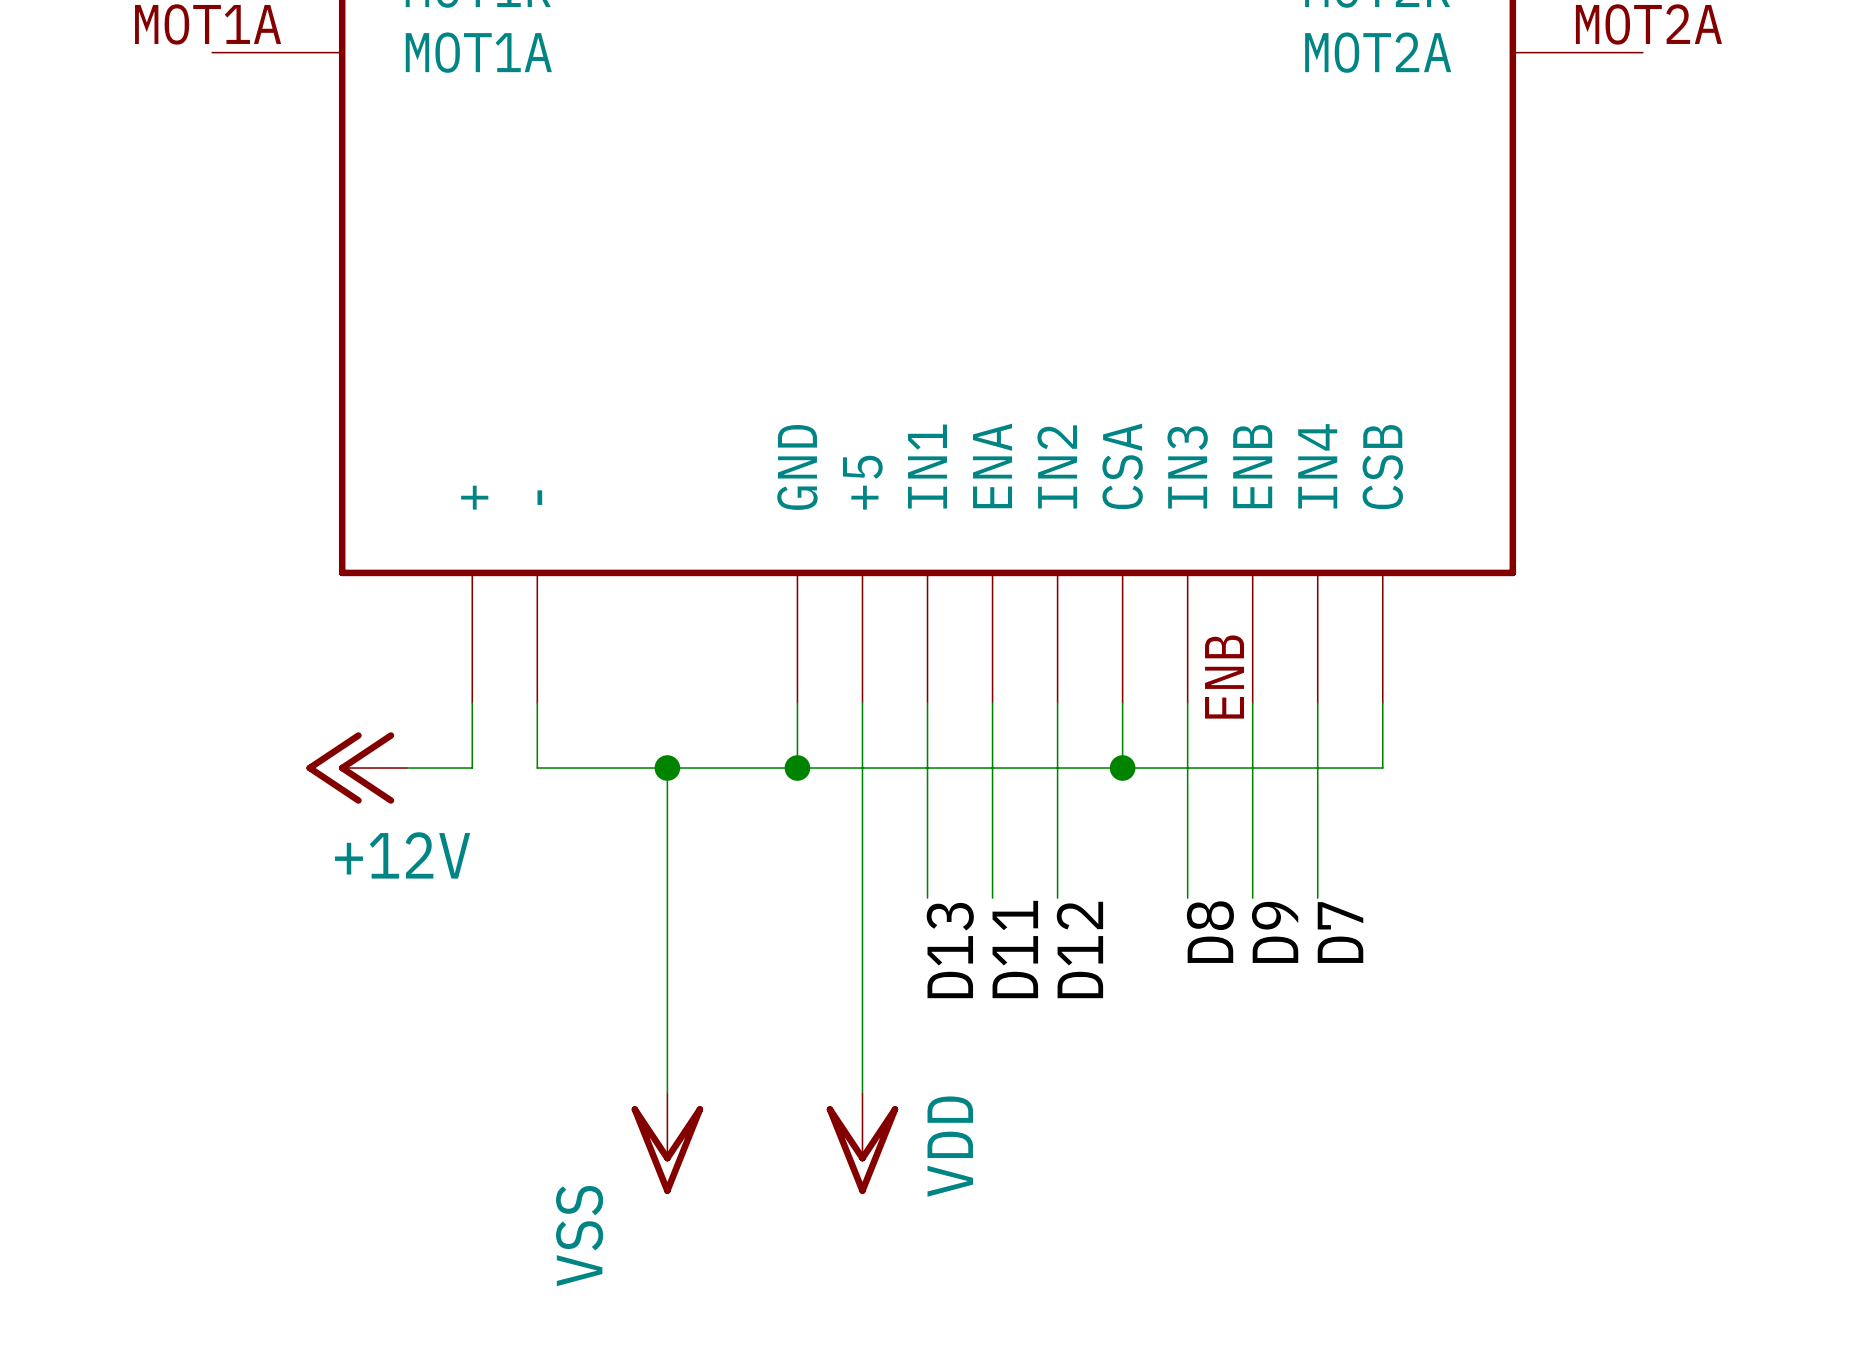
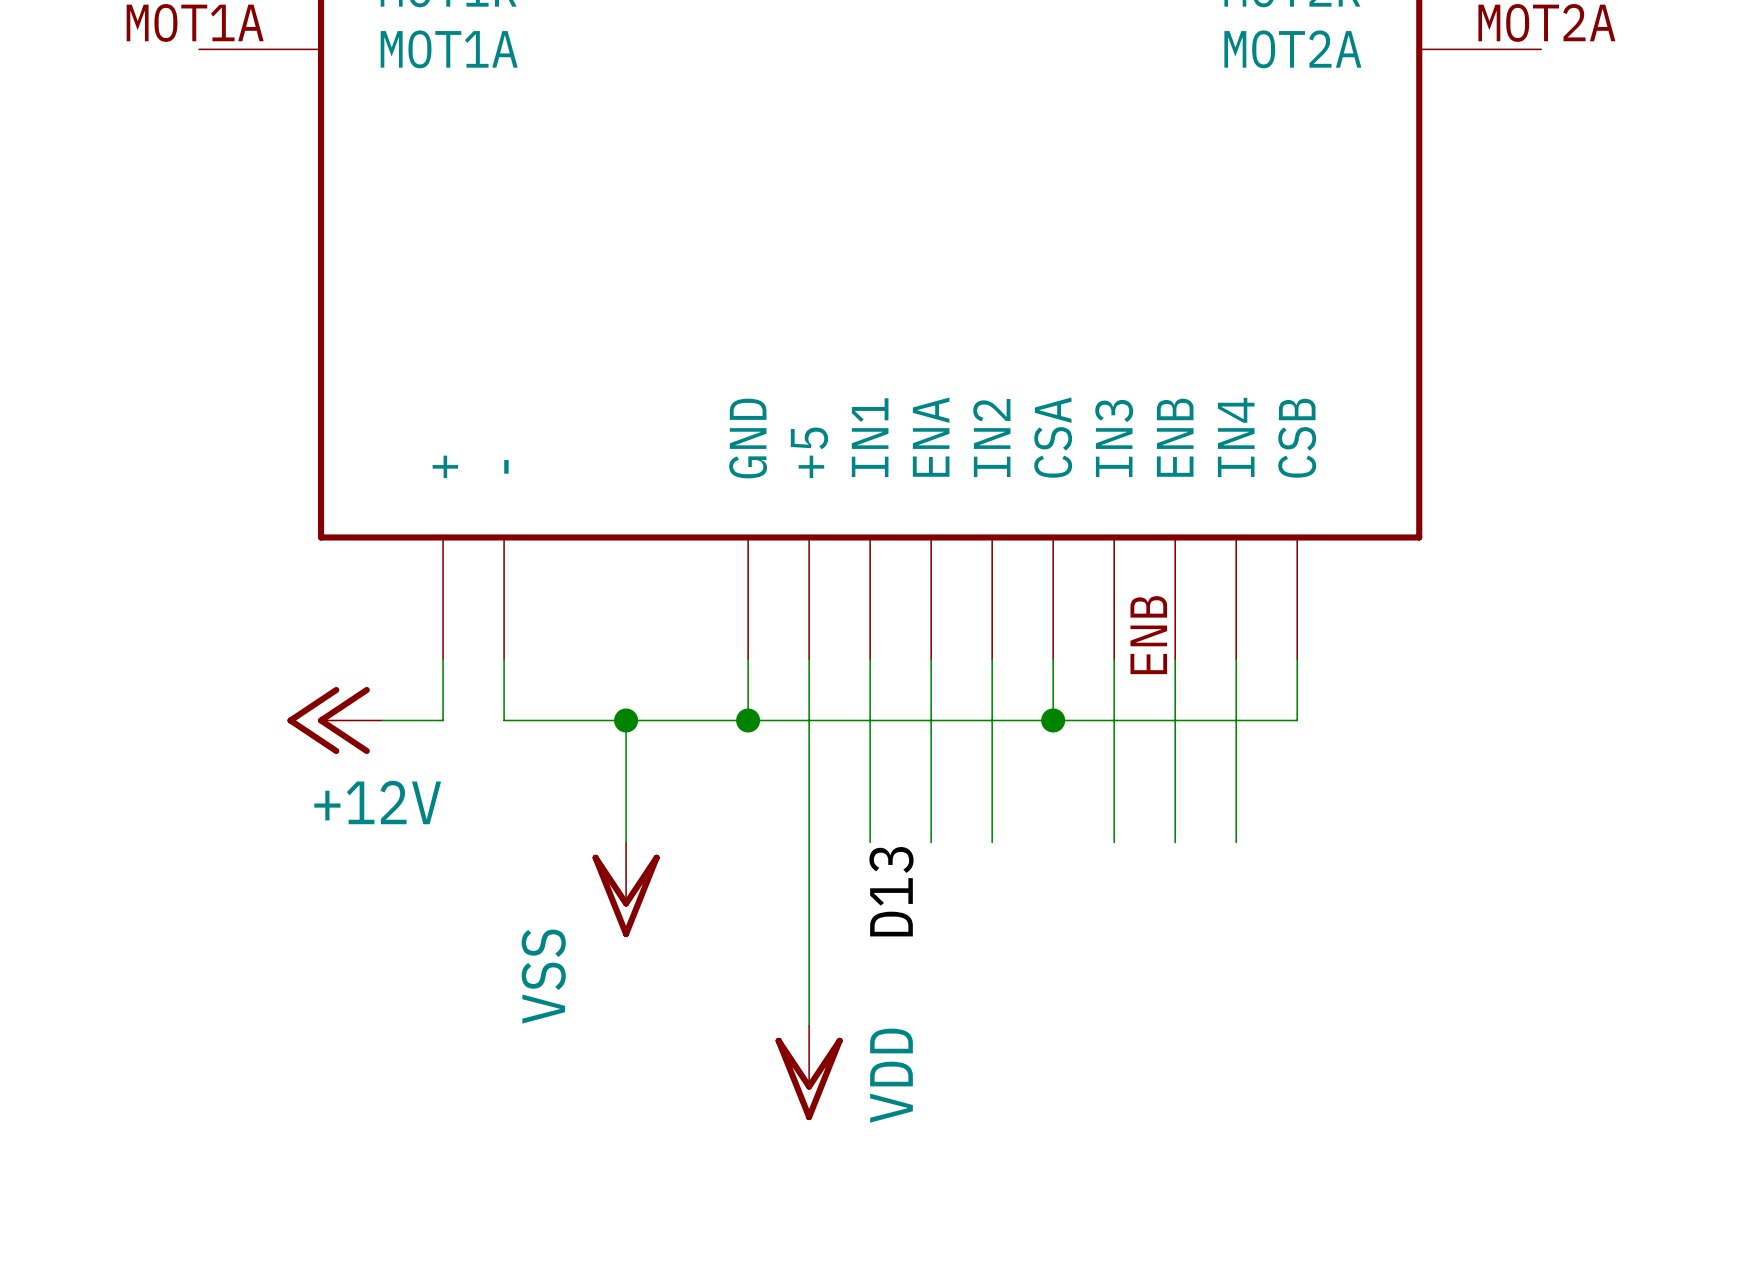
wire: (667, 898) (667, 1093) -> none
label: D8 (1210, 932) -> none
label: D9 (1275, 932) -> none
label: D7 (1340, 932) -> none
label: D11 (1015, 949) -> none
label: D12 (1079, 949) -> none
power symbol position: VSS (667, 1143) -> VSS (626, 889)

